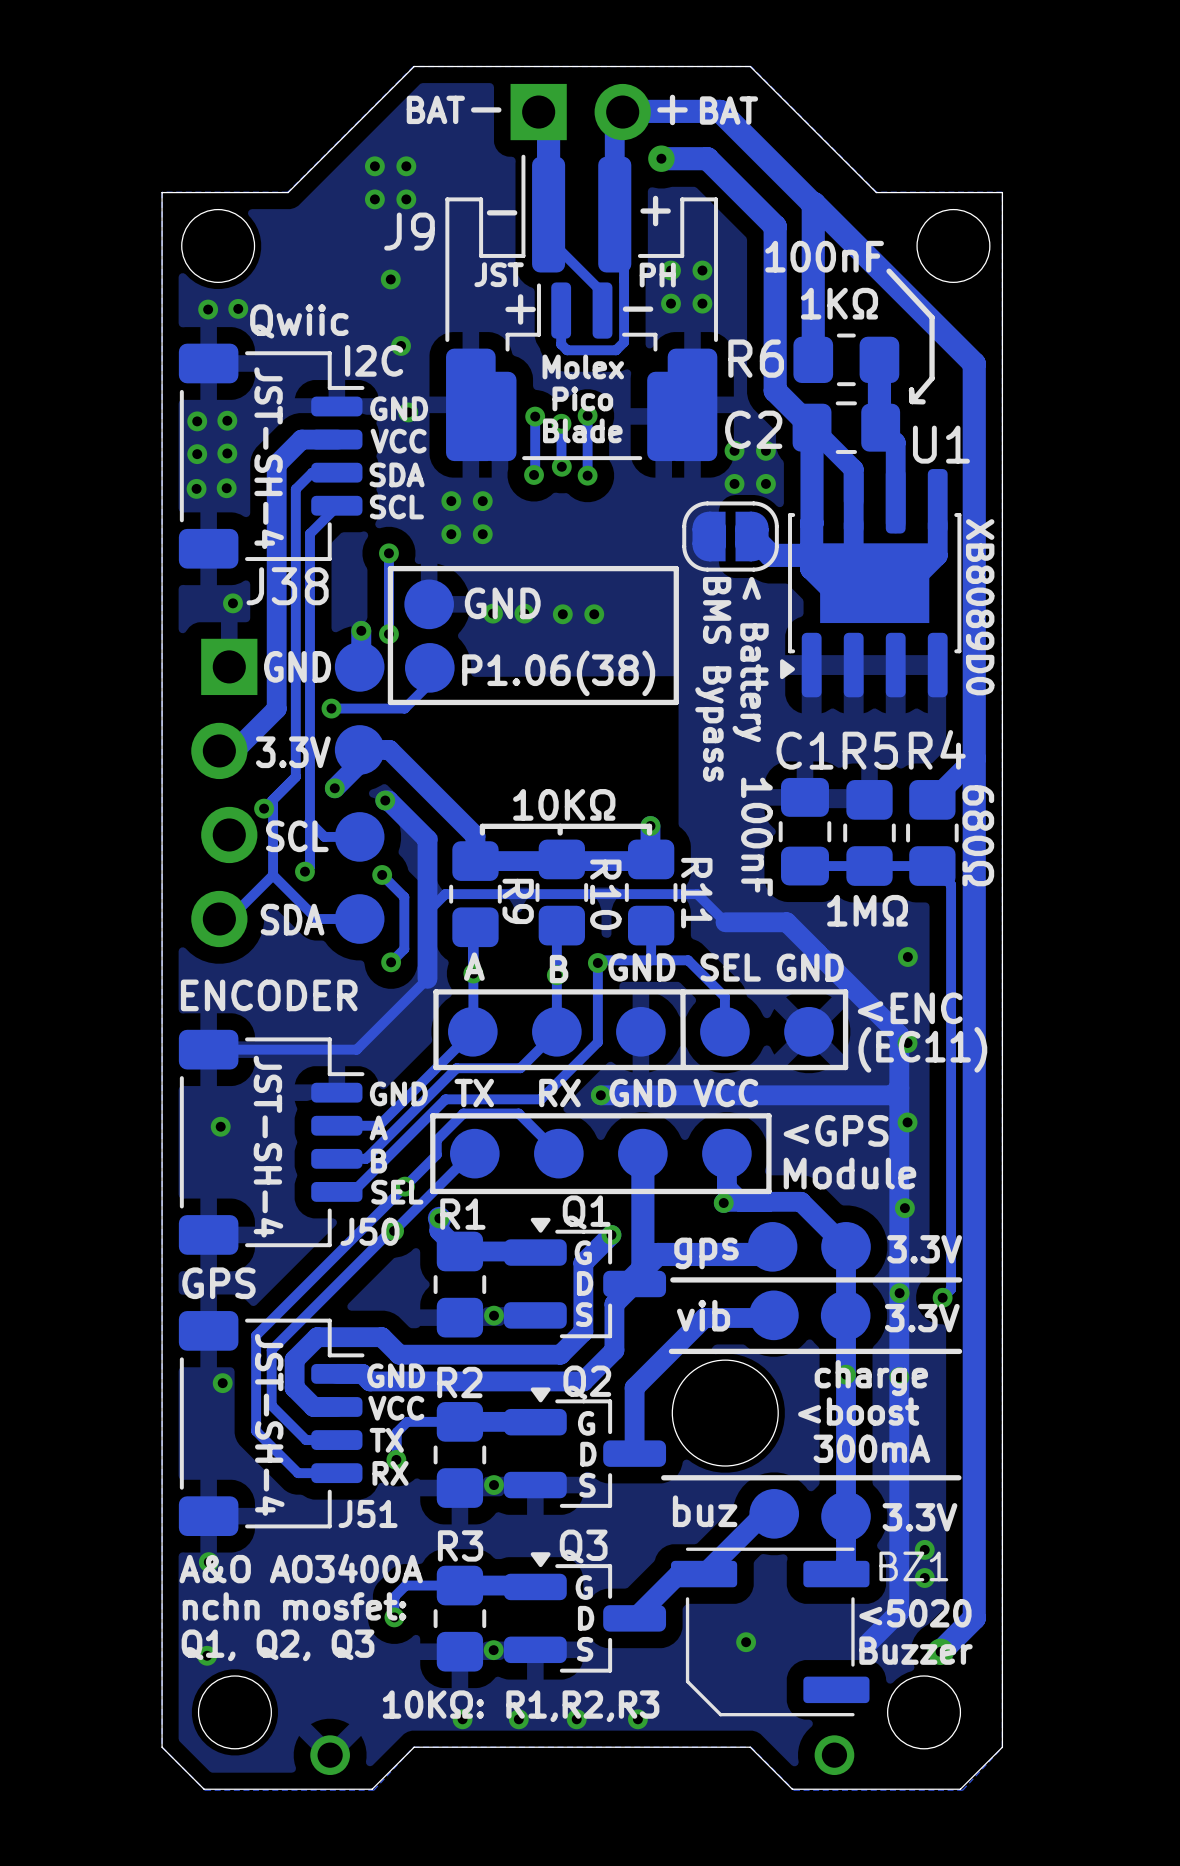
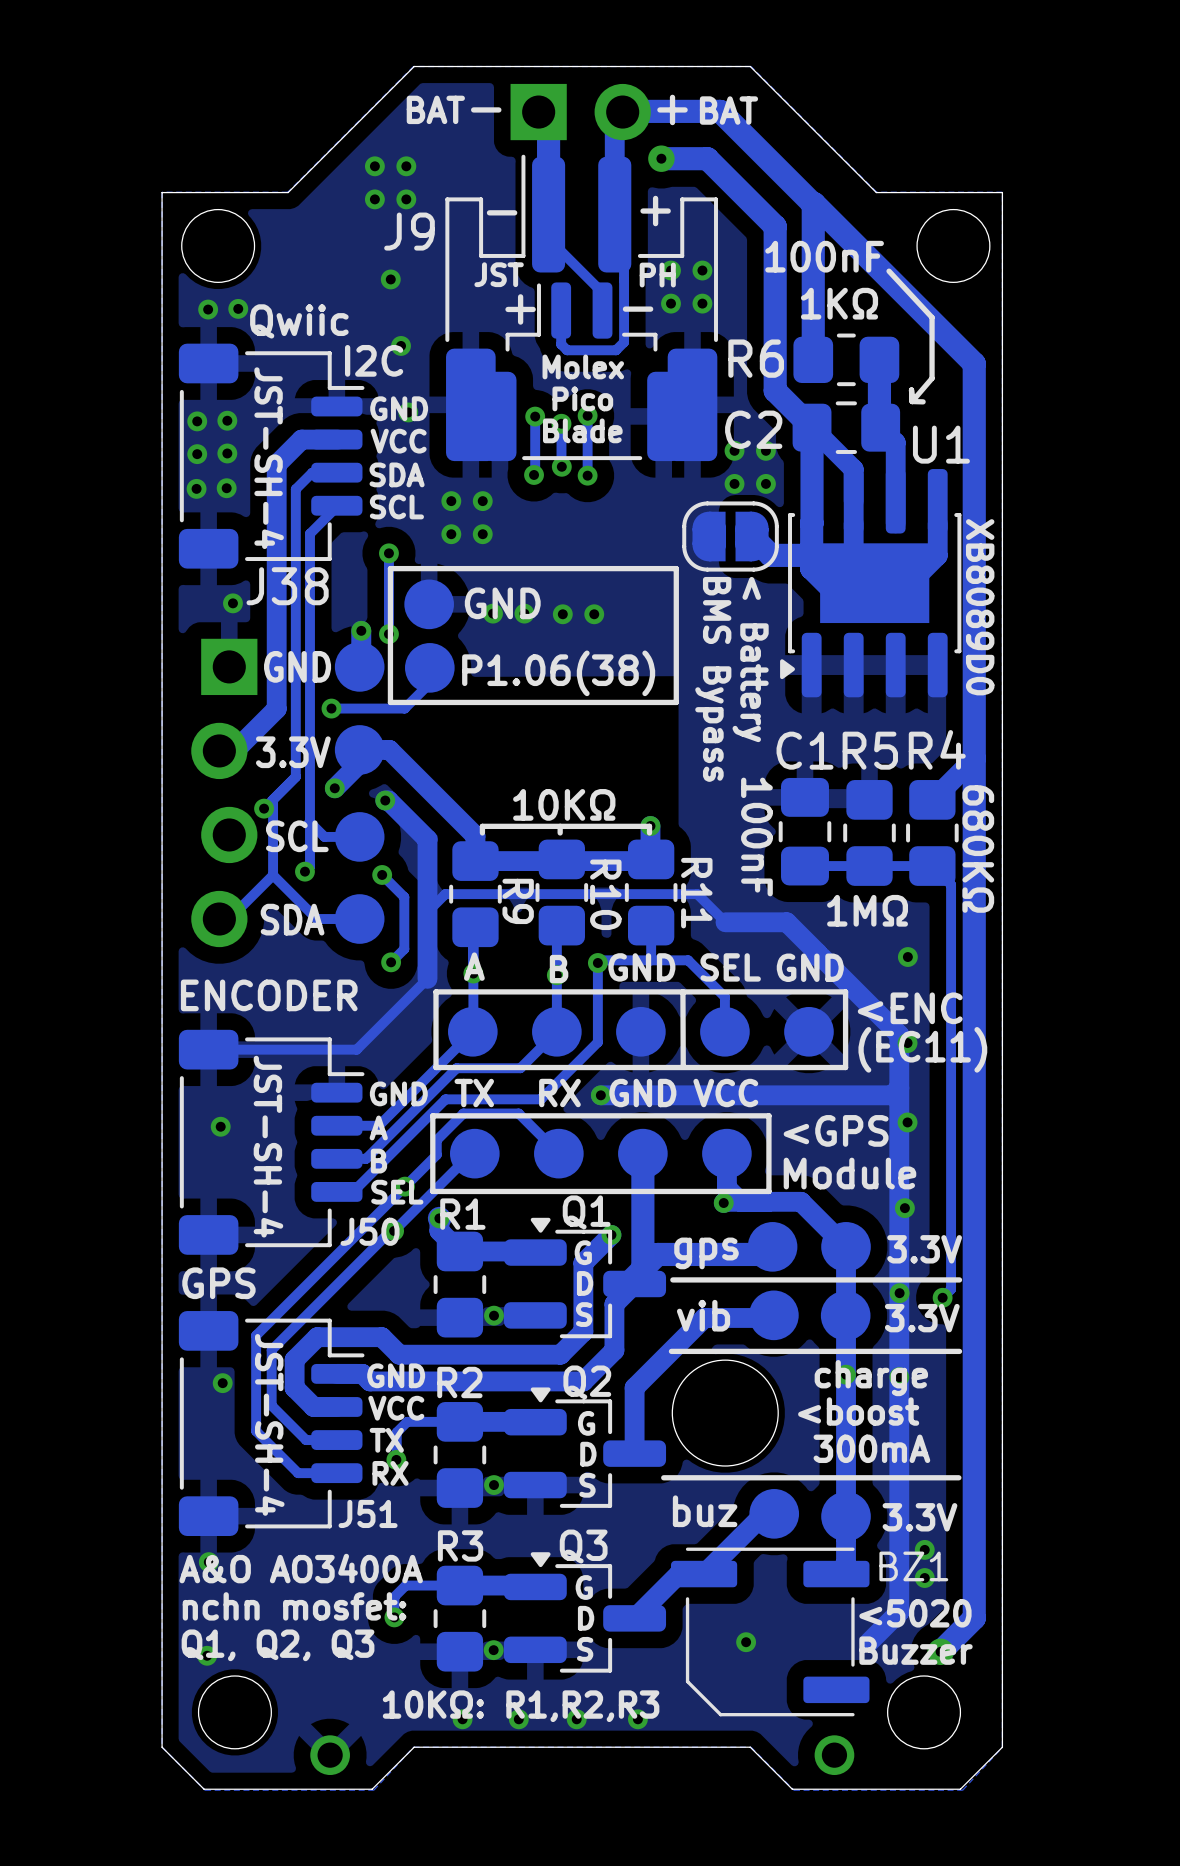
text: 680Ω (978, 835) -> 680KΩ (978, 849)

